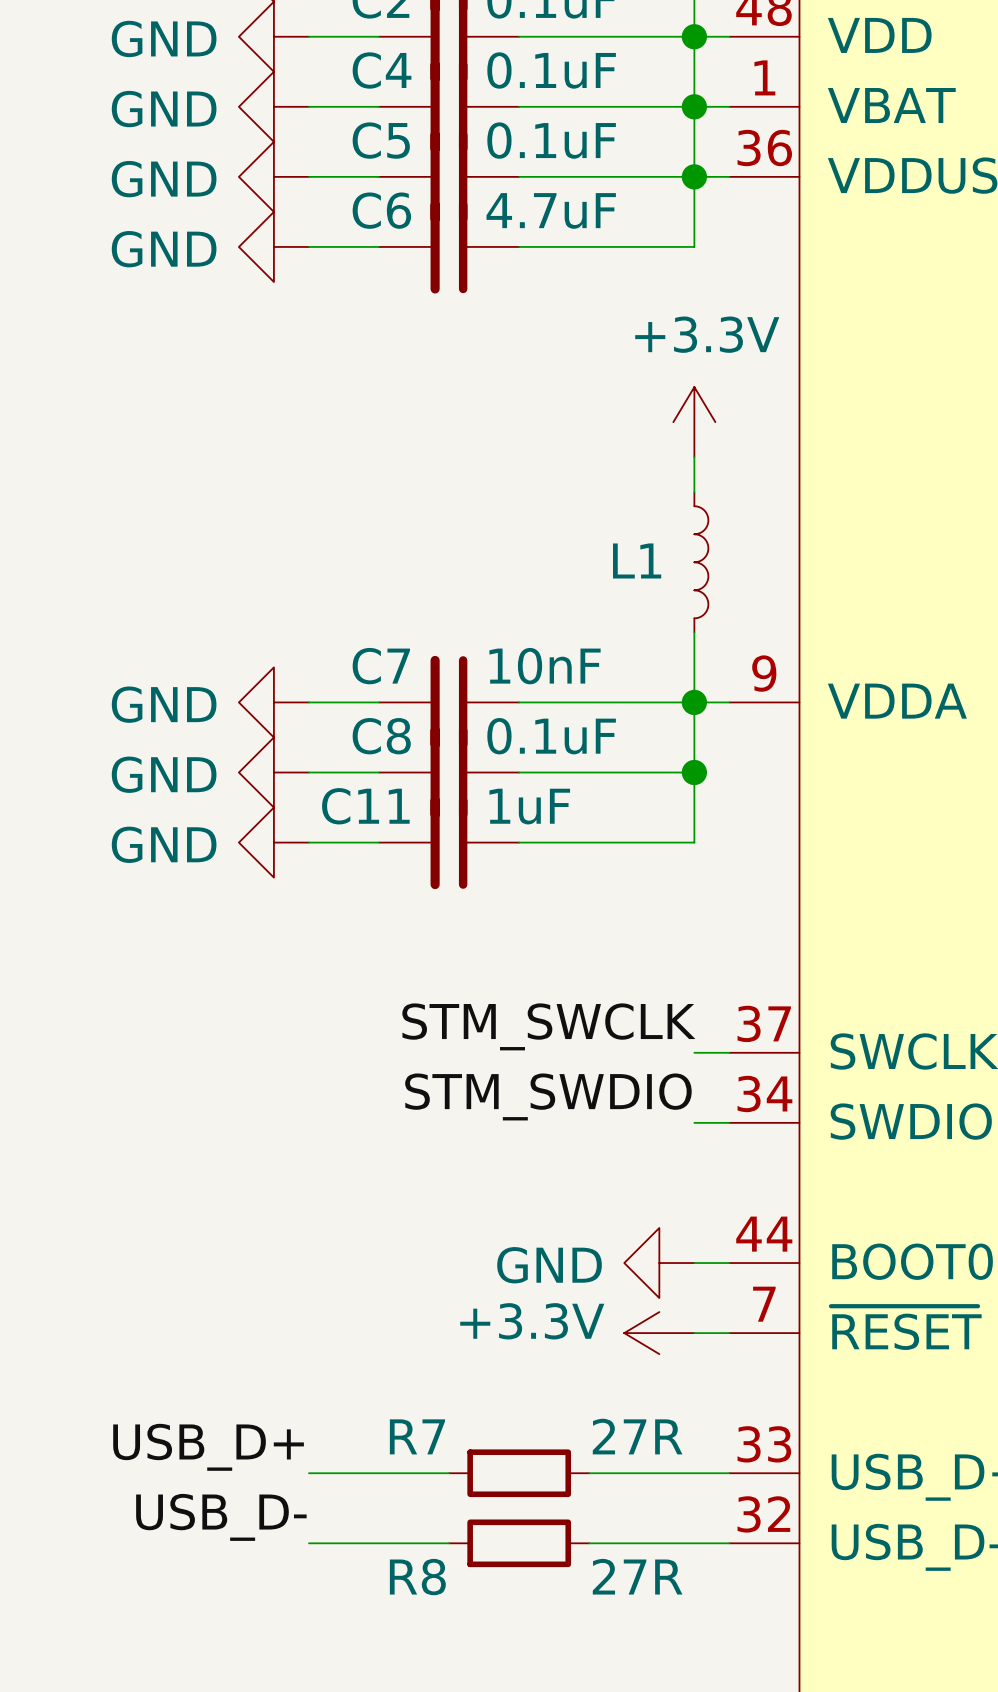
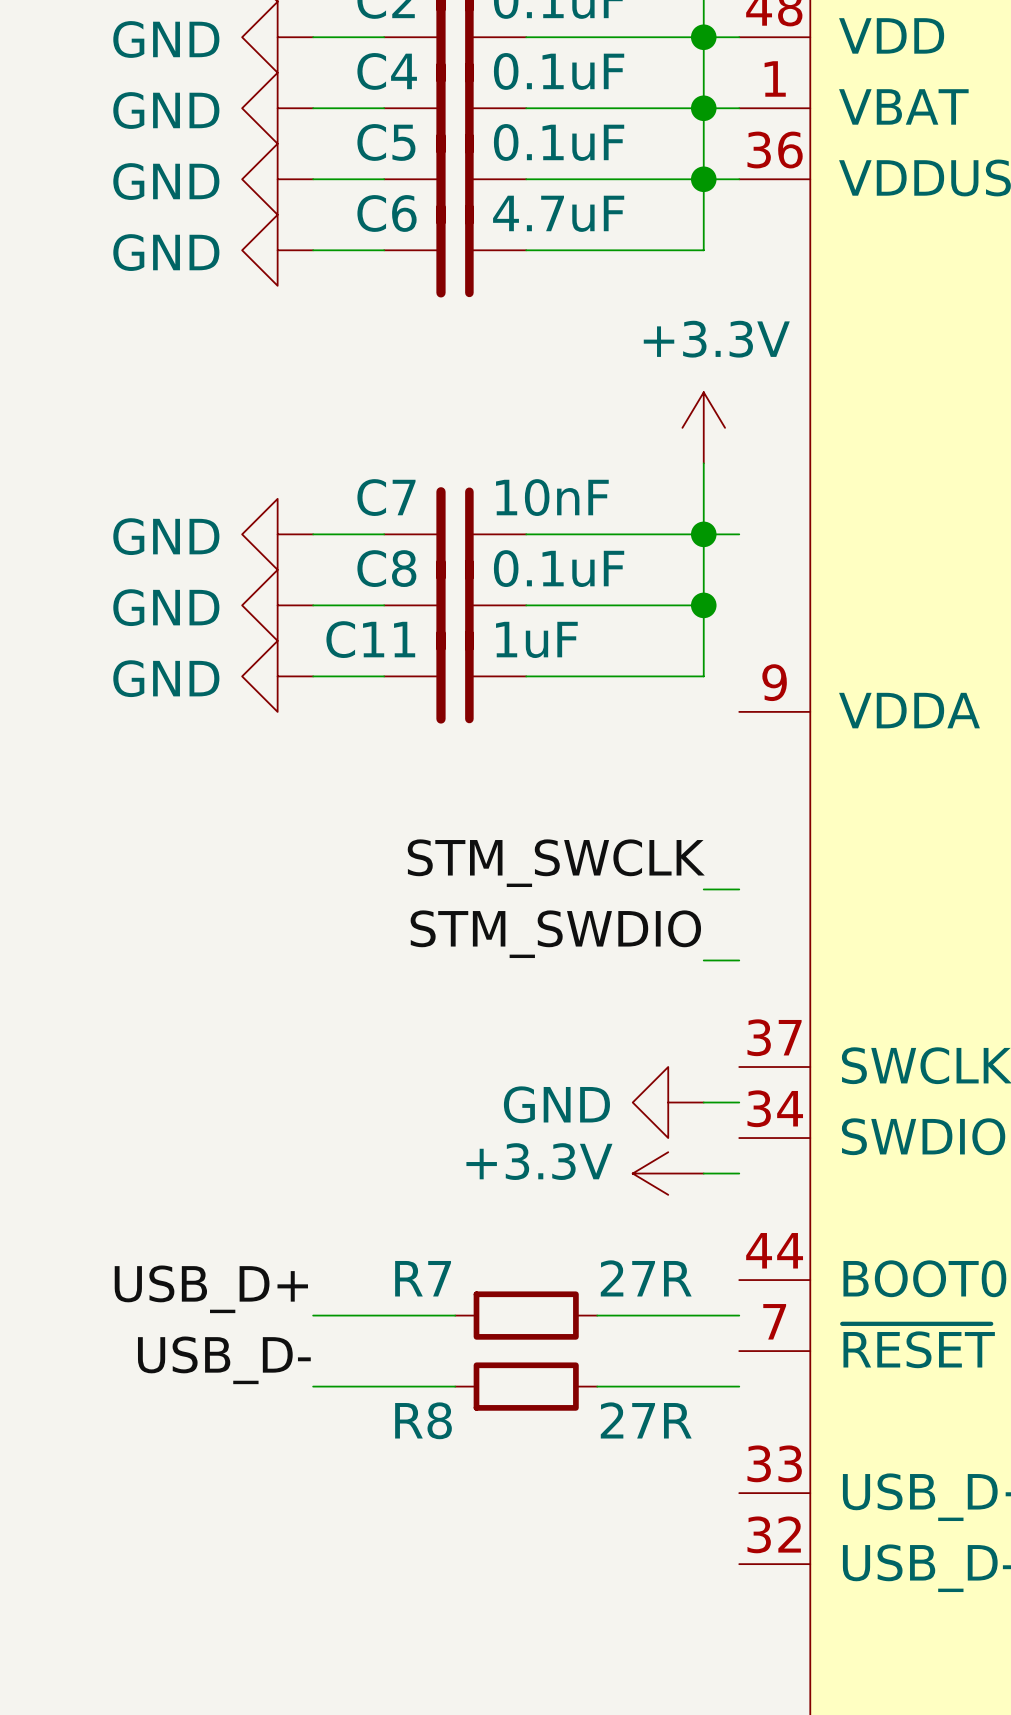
wire: none -> (703, 498) (703, 640)
power symbol: none -> GND (277, 534)
junction: none -> (703, 534)
L1: (701, 562) -> none
power symbol: none -> GND (277, 605)
junction: none -> (703, 605)
wire: (694, 667) (694, 842) (519, 842) -> (703, 676) (526, 676)
power symbol position: GND (273, 702) -> GND (277, 676)
wire: (308, 702) (379, 702) -> (313, 534) (384, 534)
C7 position: (449, 702) -> (455, 534)
wire: (519, 702) (729, 702) -> (526, 534) (739, 534)
junction: (694, 702) -> none
power symbol: GND (273, 772) -> none
wire: (308, 772) (379, 772) -> (313, 605) (384, 605)
C8 position: (449, 772) -> (455, 605)
wire: (519, 772) (694, 772) -> (526, 605) (703, 605)
junction: (694, 772) -> none
power symbol: GND (273, 842) -> none
wire: (308, 842) (379, 842) -> (313, 676) (384, 676)
C11 position: (449, 842) -> (455, 676)
label position: STM_SWCLK (548, 1026) -> STM_SWCLK (556, 863)
wire: (694, 1052) (729, 1052) -> (703, 889) (739, 889)
label position: STM_SWDIO (548, 1096) -> STM_SWDIO (555, 934)
wire: (694, 1122) (729, 1122) -> (703, 960) (739, 960)
power symbol position: GND (659, 1263) -> GND (668, 1102)
wire: (694, 1263) (729, 1263) -> (703, 1102) (739, 1102)
power symbol position: +3.3V (659, 1333) -> +3.3V (668, 1173)
wire: (694, 1333) (729, 1333) -> (703, 1173) (739, 1173)
label position: USB_D+ (208, 1447) -> USB_D+ (211, 1289)
wire: (308, 1473) (449, 1473) -> (313, 1315) (455, 1315)
R7 position: (519, 1473) -> (526, 1315)
wire: (589, 1473) (729, 1473) -> (597, 1315) (739, 1315)
label position: USB_D- (221, 1517) -> USB_D- (224, 1360)
wire: (308, 1543) (449, 1543) -> (313, 1386) (455, 1386)
R8 position: (519, 1543) -> (526, 1386)
wire: (589, 1543) (729, 1543) -> (597, 1386) (739, 1386)

